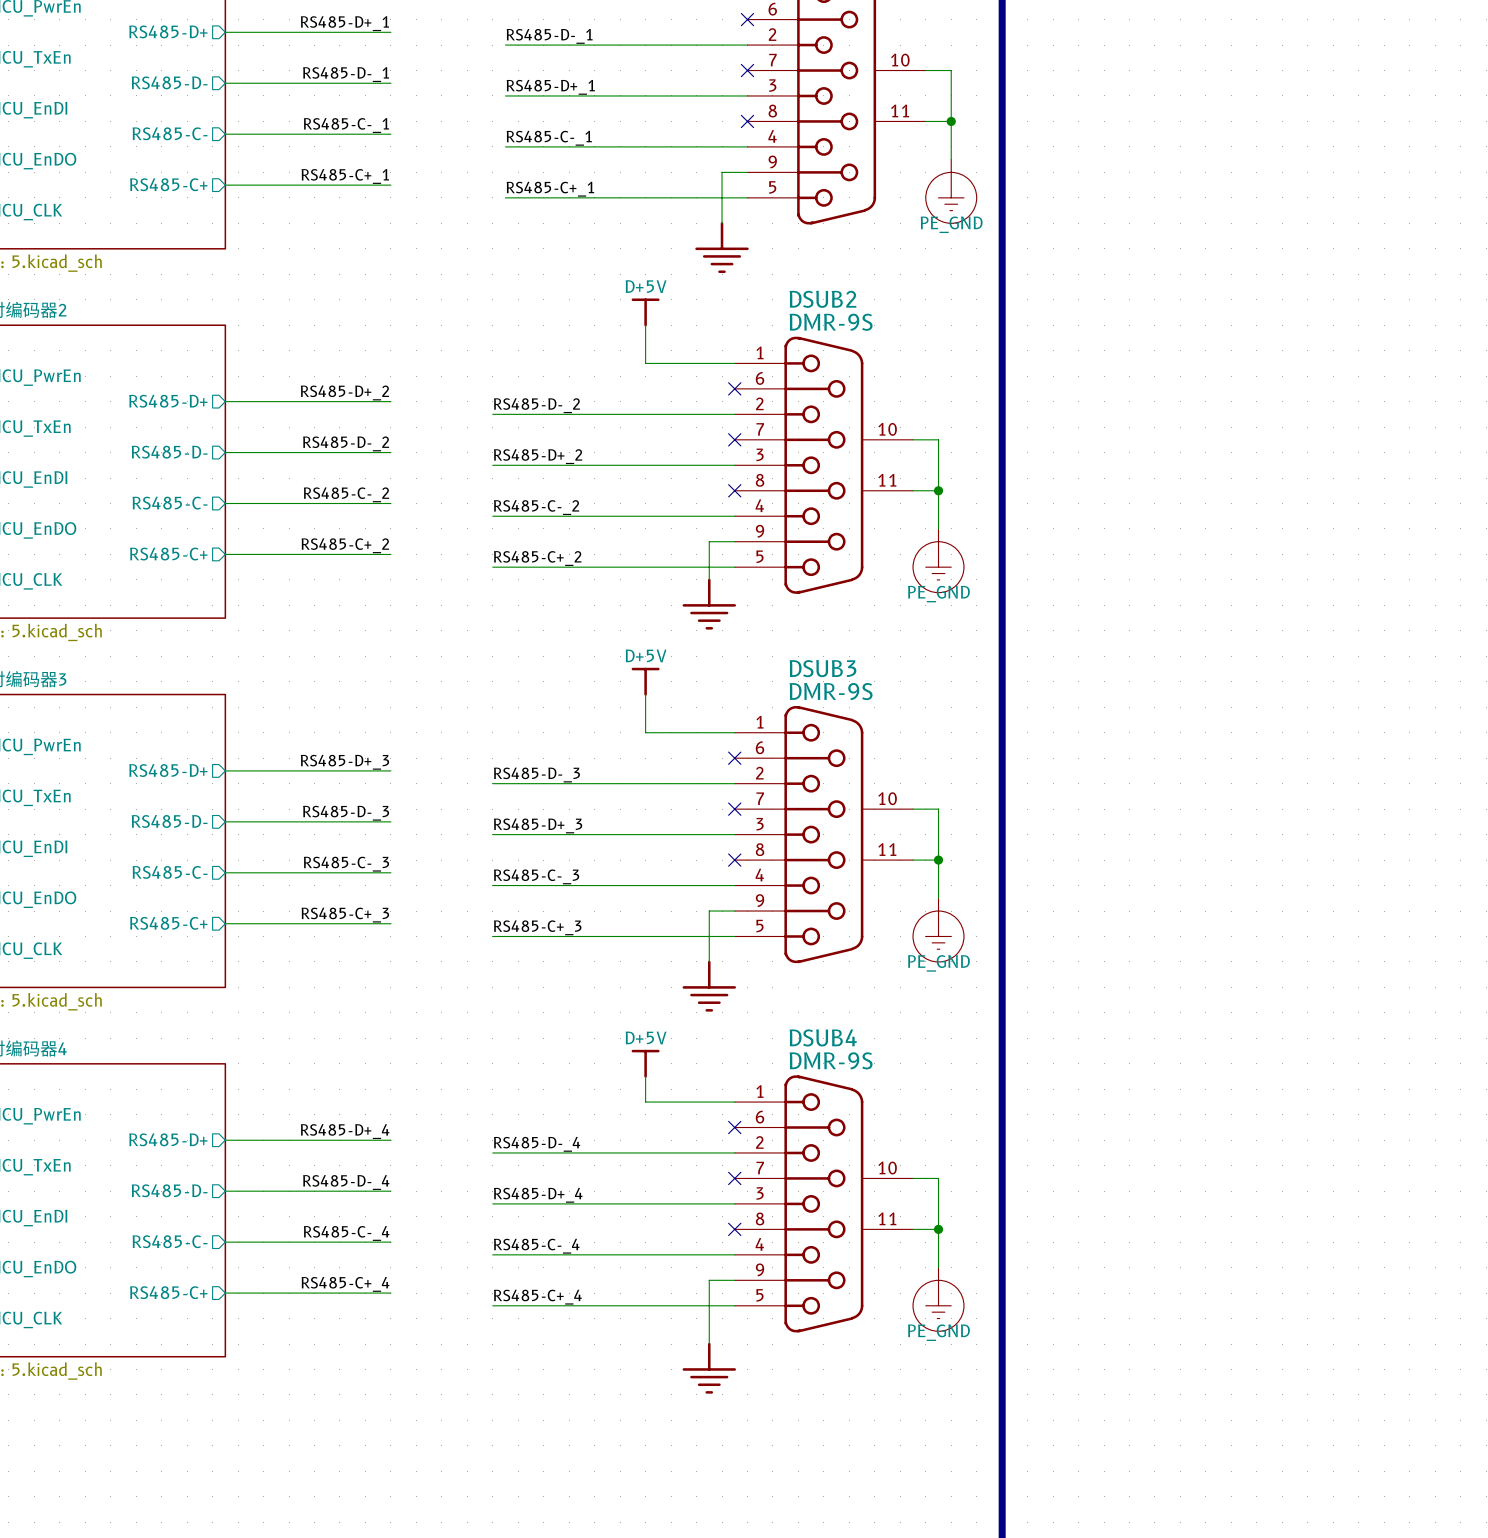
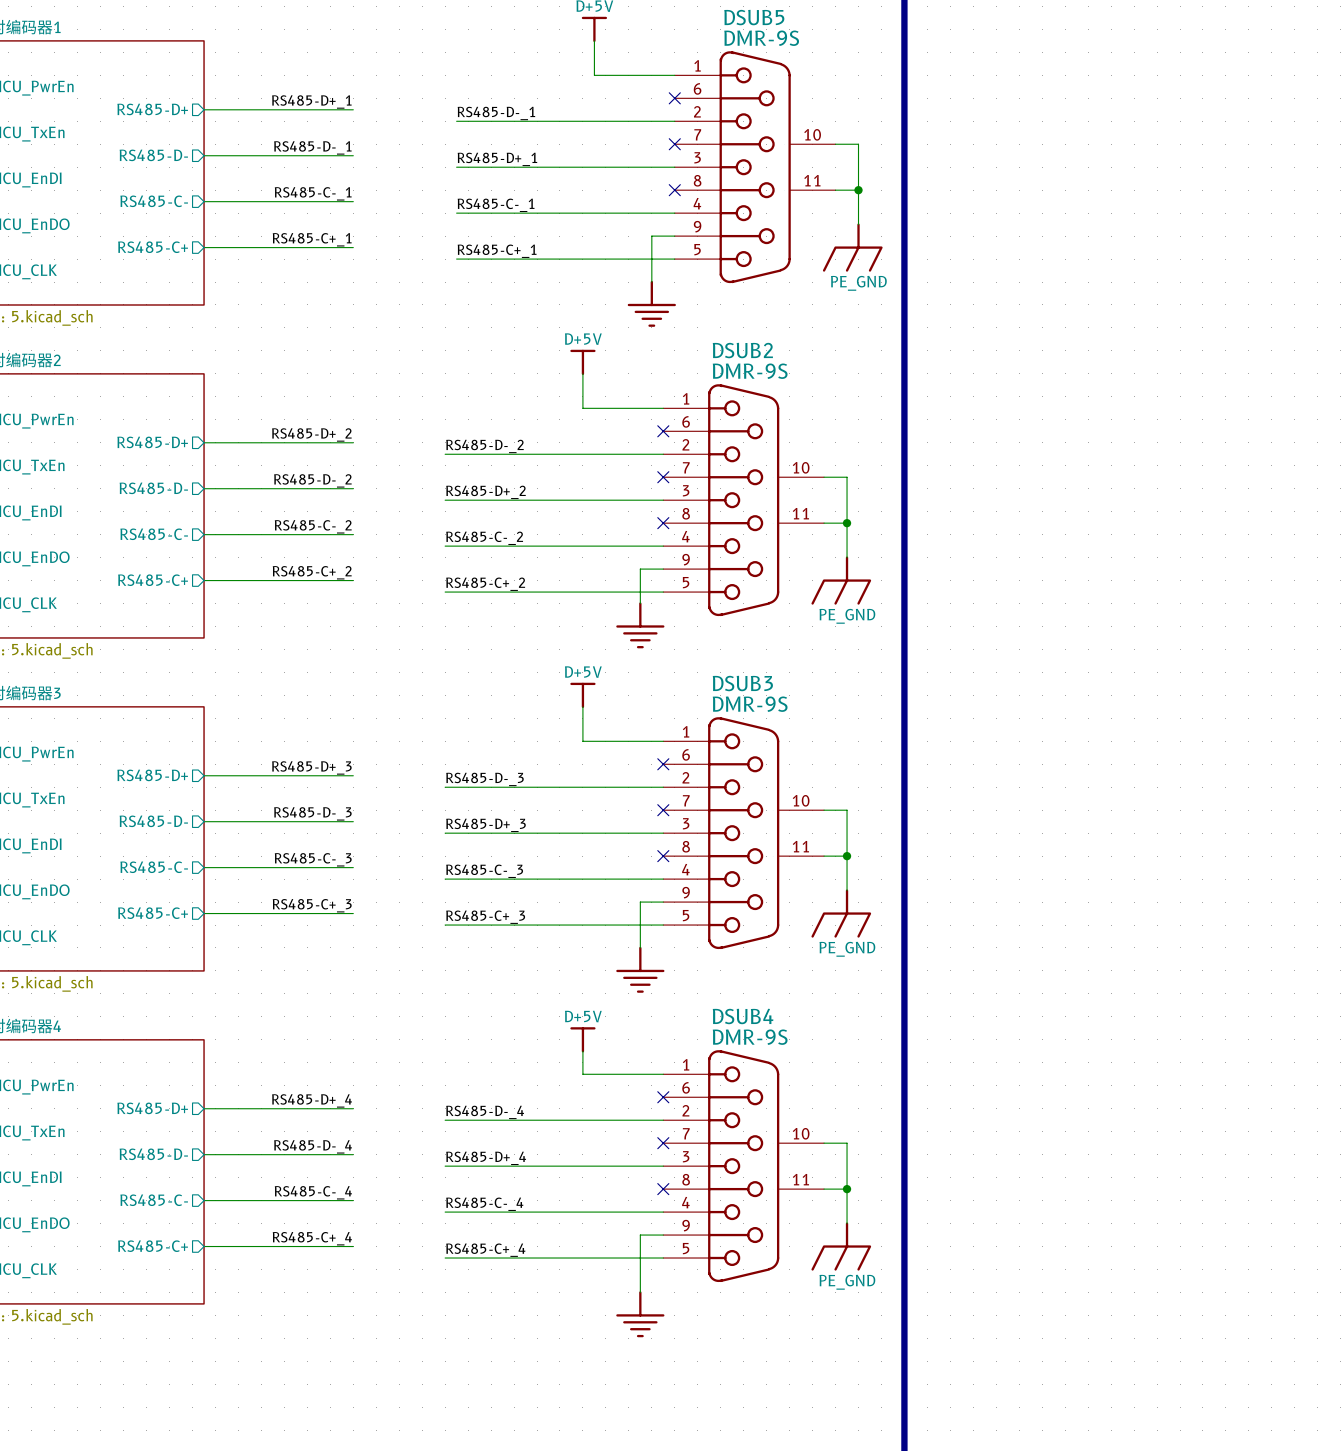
power symbol shape: [925, 159, 977, 224] -> [822, 223, 883, 272]
power symbol shape: [913, 528, 964, 593] -> [811, 556, 872, 605]
power symbol shape: [913, 898, 964, 962] -> [811, 889, 872, 938]
power symbol shape: [913, 1267, 964, 1332] -> [811, 1222, 872, 1271]

